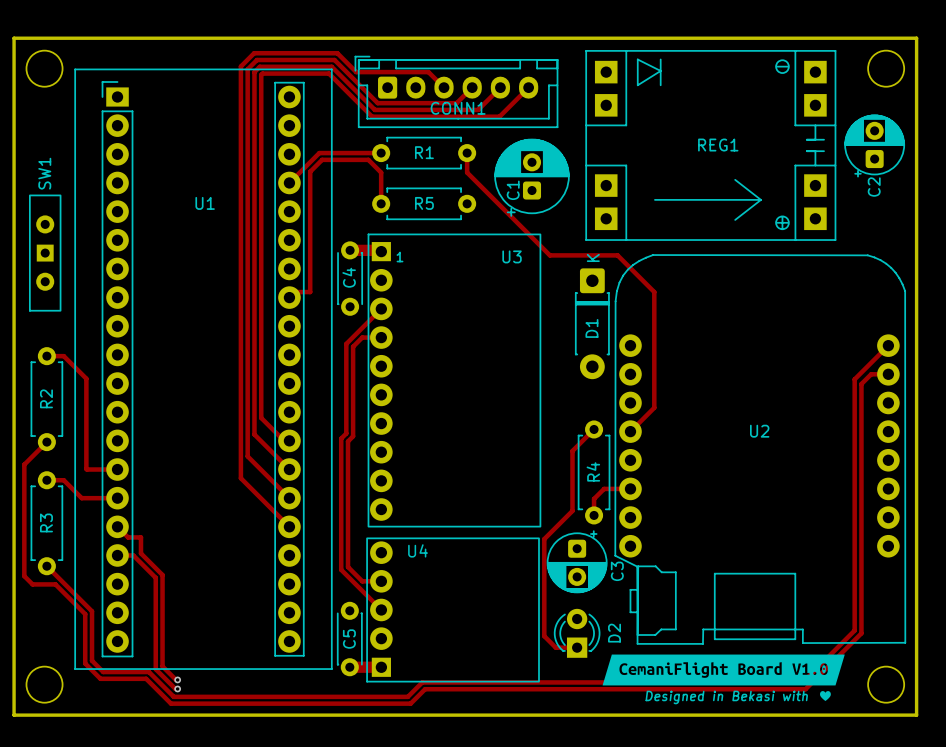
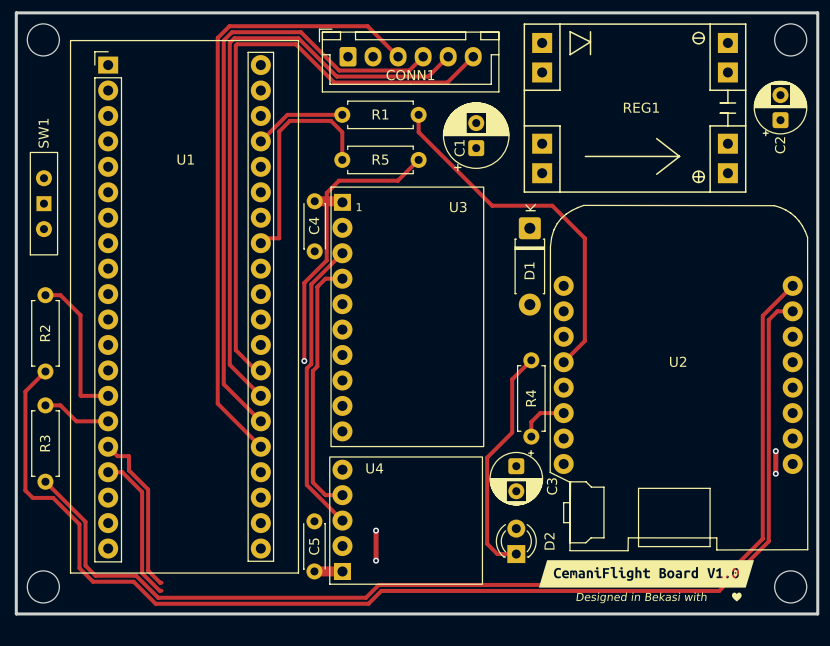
track: (337, 53) (356, 72) (428, 72) -> (303, 26) (367, 26) (384, 42)
track: none -> (418, 159) (397, 180) (339, 180) (326, 193) (326, 260) (304, 282) (304, 361)
via: none -> (304, 361)
track: none -> (775, 451) (775, 473)
via: none -> (775, 451)
via: none -> (775, 473)
track: none -> (376, 530) (376, 560)
via: none -> (376, 530)
via: none -> (376, 560)
via: (177, 679) -> none
via: (177, 688) -> none

